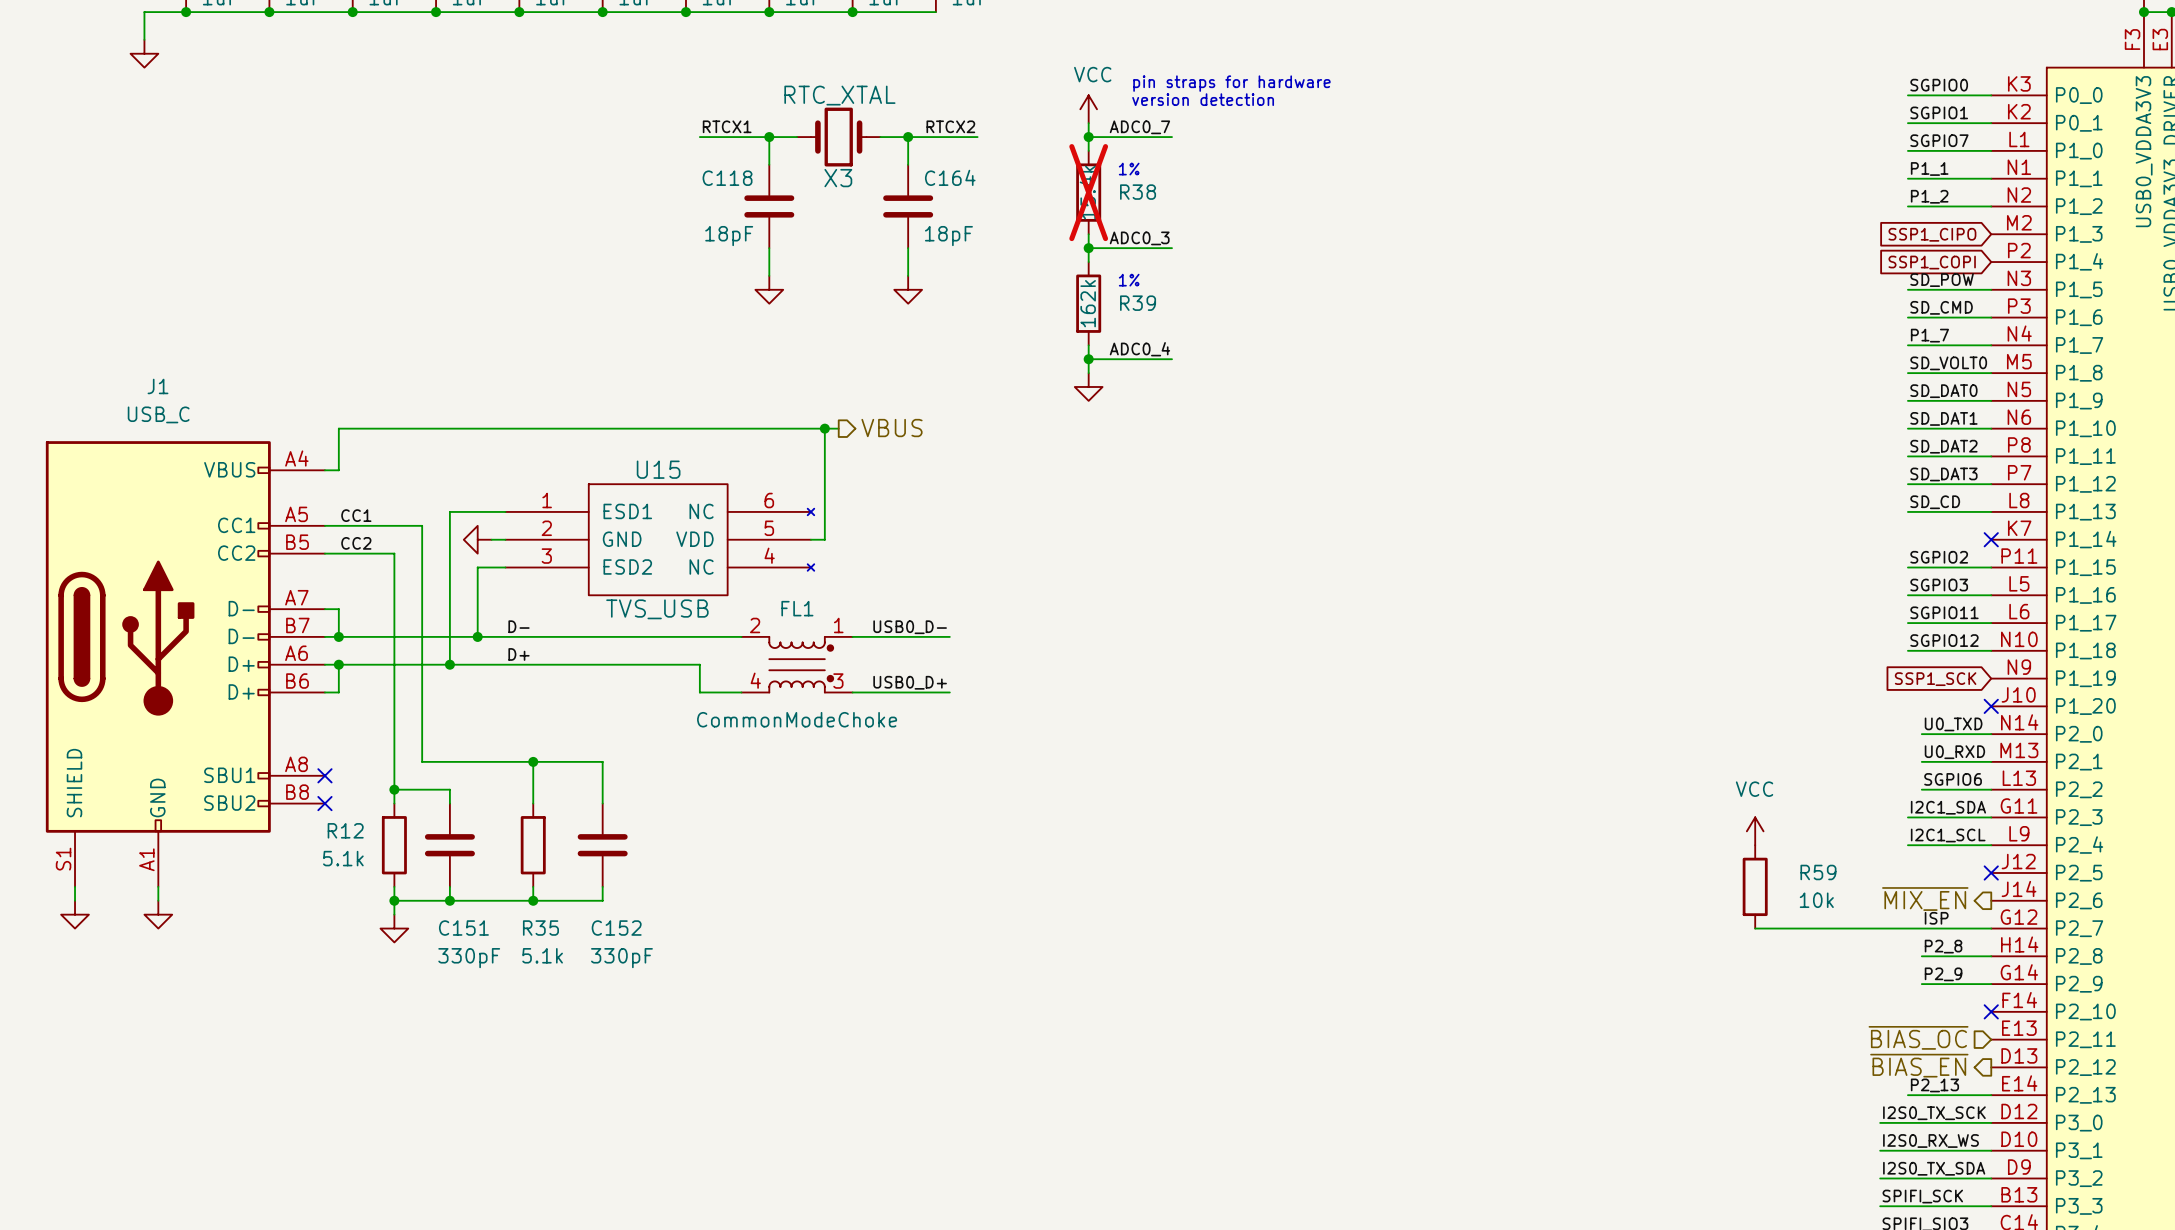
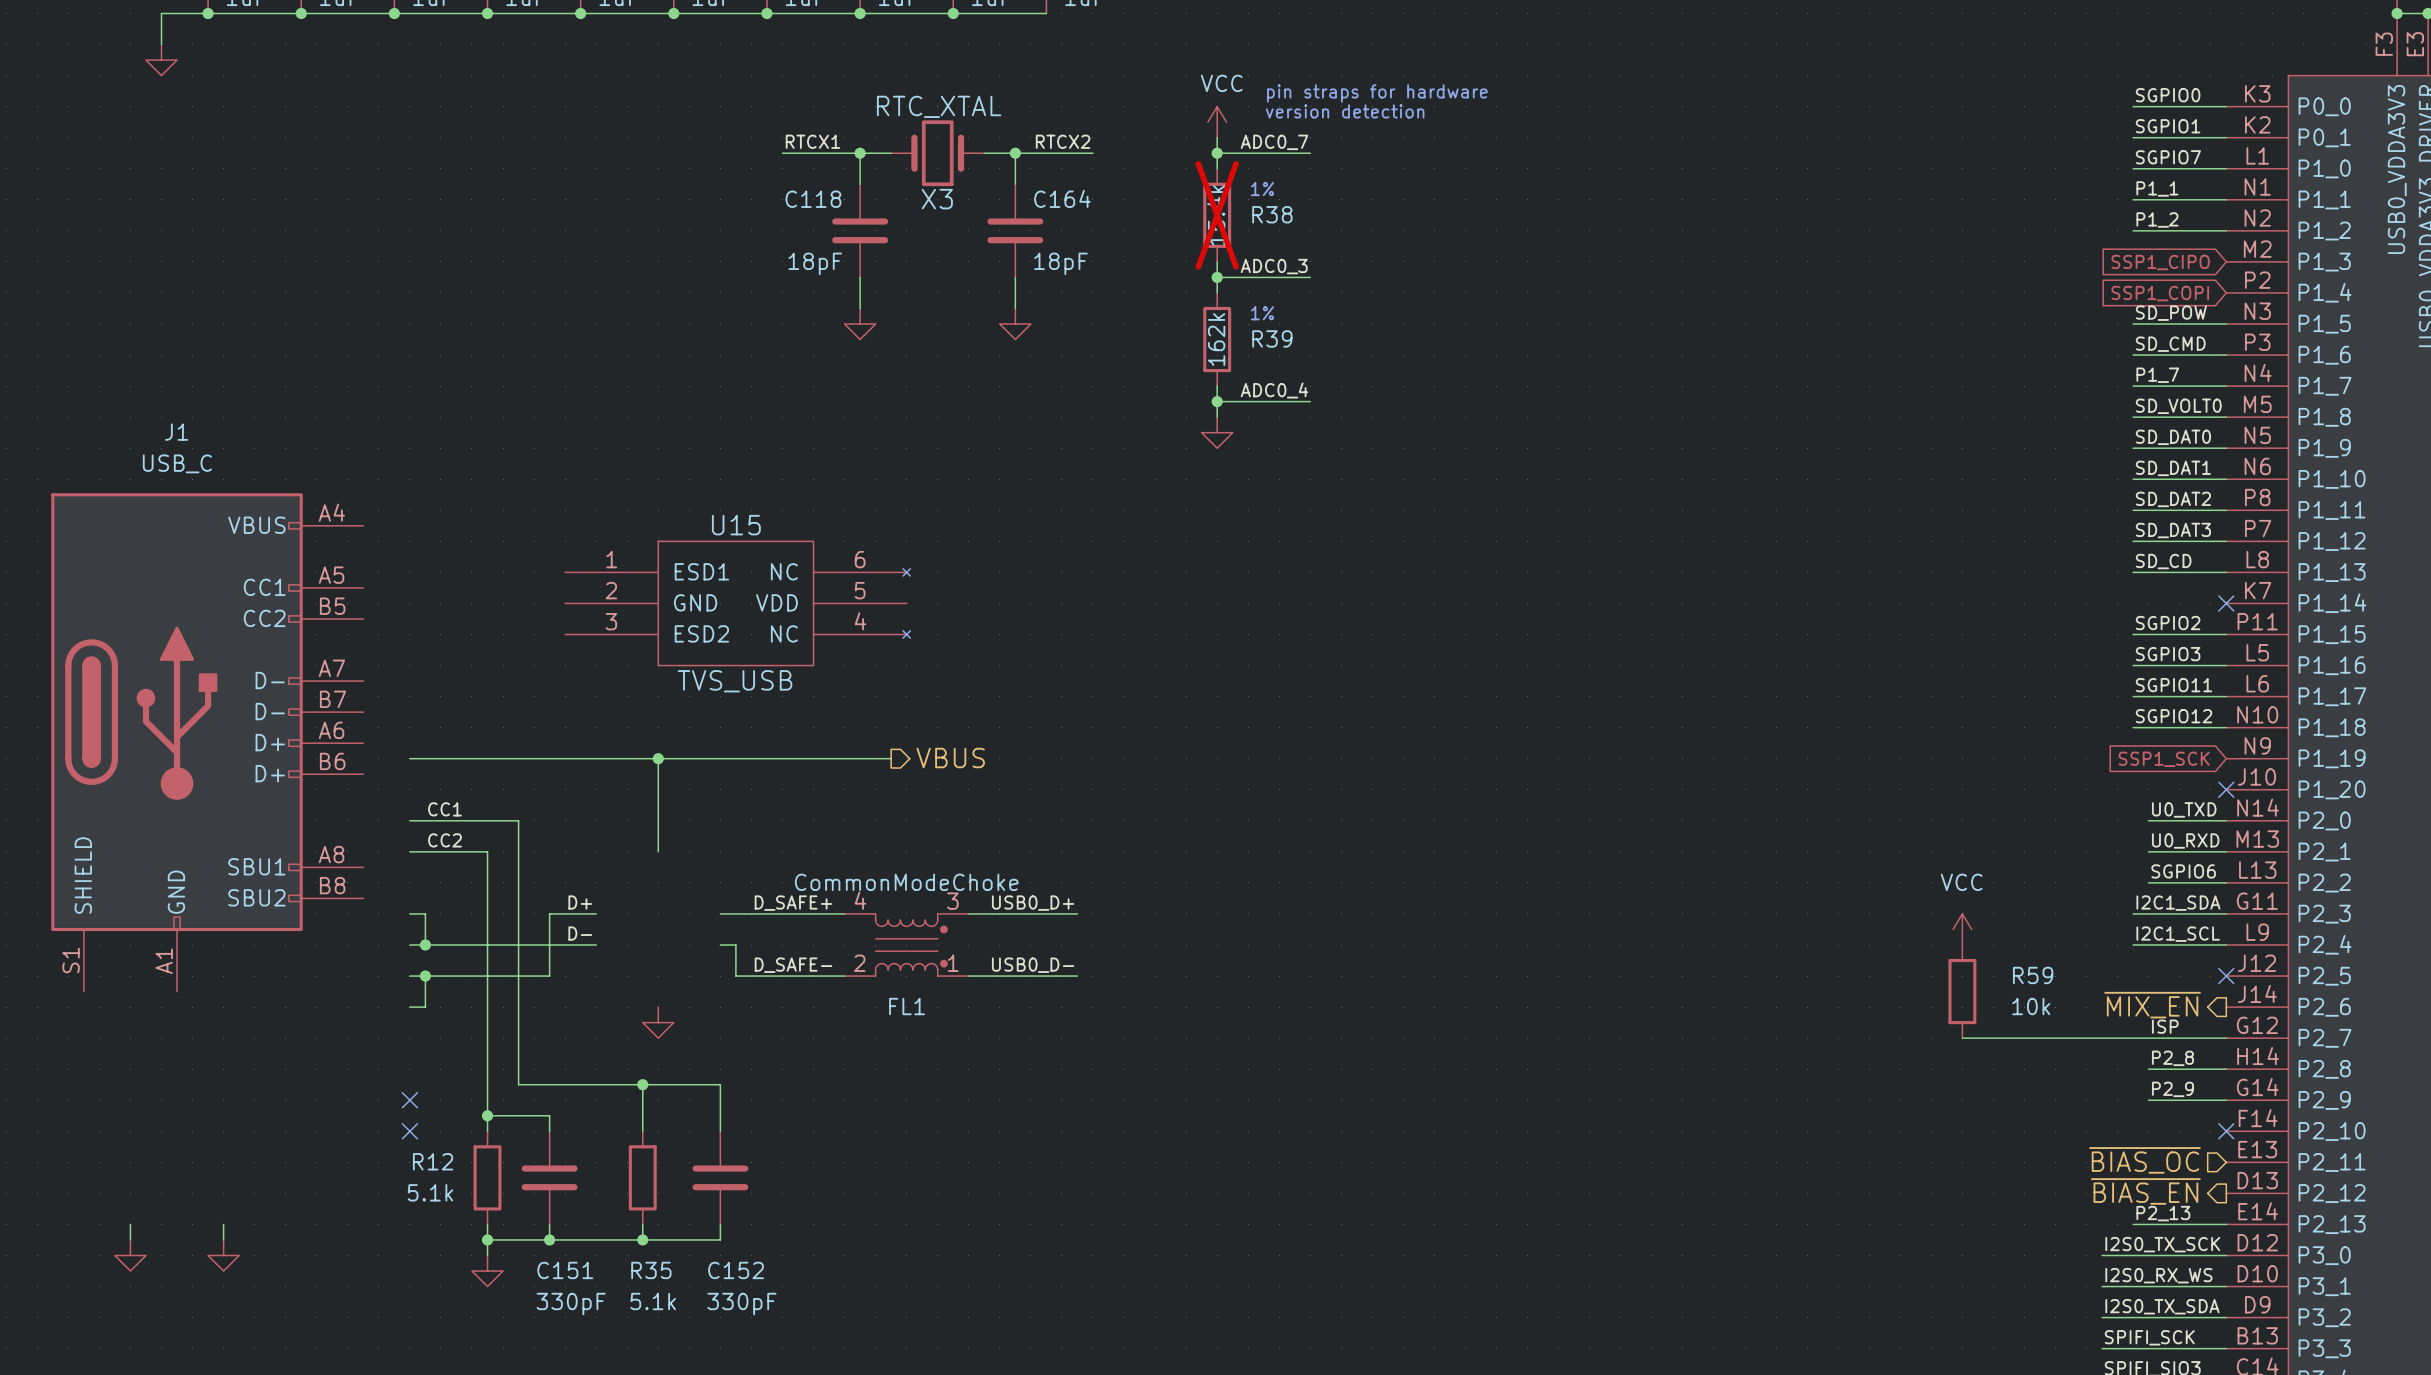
wire: (824, 428) (824, 539) (810, 539) -> none
junction: (824, 428) -> none
wire: (838, 428) (338, 428) (338, 470) (324, 470) -> none
hierarchical label position: VBUS (892, 428) -> VBUS (950, 758)
wire: (505, 511) (449, 511) (449, 664) -> none
label position: CC1 (356, 515) -> CC1 (444, 809)
wire: (324, 525) (422, 525) (422, 761) -> (409, 851) (471, 851)
power symbol: (477, 539) -> none
wire: (491, 539) (505, 539) -> none
label position: CC2 (356, 543) -> CC2 (444, 840)
wire: (324, 553) (394, 553) (394, 803) -> none
wire: (505, 567) (477, 567) (477, 636) -> none
wire: (324, 609) (338, 609) (338, 636) -> (409, 913) (425, 913) (425, 945)
label position: D- (519, 626) -> D- (580, 933)
label position: USB0_D- (910, 627) -> USB0_D- (1033, 965)
wire: (324, 636) (741, 636) -> none
junction: (338, 636) -> none
junction: (477, 636) -> none
wire: (852, 636) (949, 636) -> (968, 913) (1077, 913)
label position: D+ (519, 654) -> D+ (580, 902)
wire: (324, 664) (699, 664) (699, 692) (741, 692) -> none
wire: (338, 664) (338, 692) (324, 692) -> (425, 976) (425, 1007) (409, 1007)
junction: (338, 664) -> none
junction: (449, 664) -> none
FL1 position: (797, 664) -> (906, 945)
FL1 flip: as is (801, 664) -> up-down (911, 945)
wire: none -> (409, 758) (891, 758)
wire: none -> (658, 758) (658, 851)
junction: none -> (658, 758)
label position: USB0_D+ (910, 682) -> USB0_D+ (1033, 903)
wire: (852, 692) (949, 692) -> (968, 976) (1077, 976)
wire: none -> (409, 820) (518, 820) (518, 1084) (720, 1084) (720, 1131)
wire: (436, 761) (602, 761) (602, 803) -> (487, 851) (487, 1131)
wire: (533, 761) (533, 803) -> (642, 1084) (642, 1131)
junction: (533, 761) -> none
no-connect mark: (324, 775) -> none
wire: (394, 789) (449, 789) (449, 803) -> (487, 1115) (549, 1115) (549, 1131)
junction: (394, 789) -> none
no-connect mark: (324, 803) -> none
label: none -> D_SAFE+ (793, 903)
wire: none -> (596, 913) (549, 913) (549, 976) (409, 976)
wire: none -> (720, 913) (844, 913)
wire: none -> (409, 945) (596, 945)
junction: none -> (425, 945)
R12 position: (394, 845) -> (487, 1177)
C151 position: (449, 845) -> (549, 1177)
R35 position: (533, 845) -> (642, 1177)
C152 position: (602, 845) -> (720, 1177)
wire: none -> (720, 945) (735, 945) (735, 976) (844, 976)
label: none -> D_SAFE- (793, 965)
junction: none -> (425, 976)
wire: (75, 886) (75, 900) -> (130, 1224) (130, 1239)
wire: (158, 886) (158, 900) -> (223, 1224) (223, 1239)
wire: (394, 886) (394, 914) -> (487, 1224) (487, 1255)
wire: (449, 886) (449, 900) -> (549, 1224) (549, 1239)
wire: (533, 886) (533, 900) -> (642, 1224) (642, 1239)
wire: (602, 886) (602, 900) (394, 900) -> (720, 1224) (720, 1239) (487, 1239)
junction: (394, 900) -> none
junction: (449, 900) -> none
junction: (533, 900) -> none
power symbol: (75, 914) -> none
power symbol: (158, 914) -> none
power symbol: none -> (658, 1022)
power symbol: (394, 928) -> none
junction: none -> (642, 1084)
no-connect mark: none -> (409, 1100)
junction: none -> (487, 1115)
no-connect mark: none -> (409, 1131)
junction: none -> (487, 1239)
junction: none -> (549, 1239)
junction: none -> (642, 1239)
power symbol: none -> (130, 1255)
power symbol: none -> (223, 1255)
power symbol: none -> (487, 1271)

